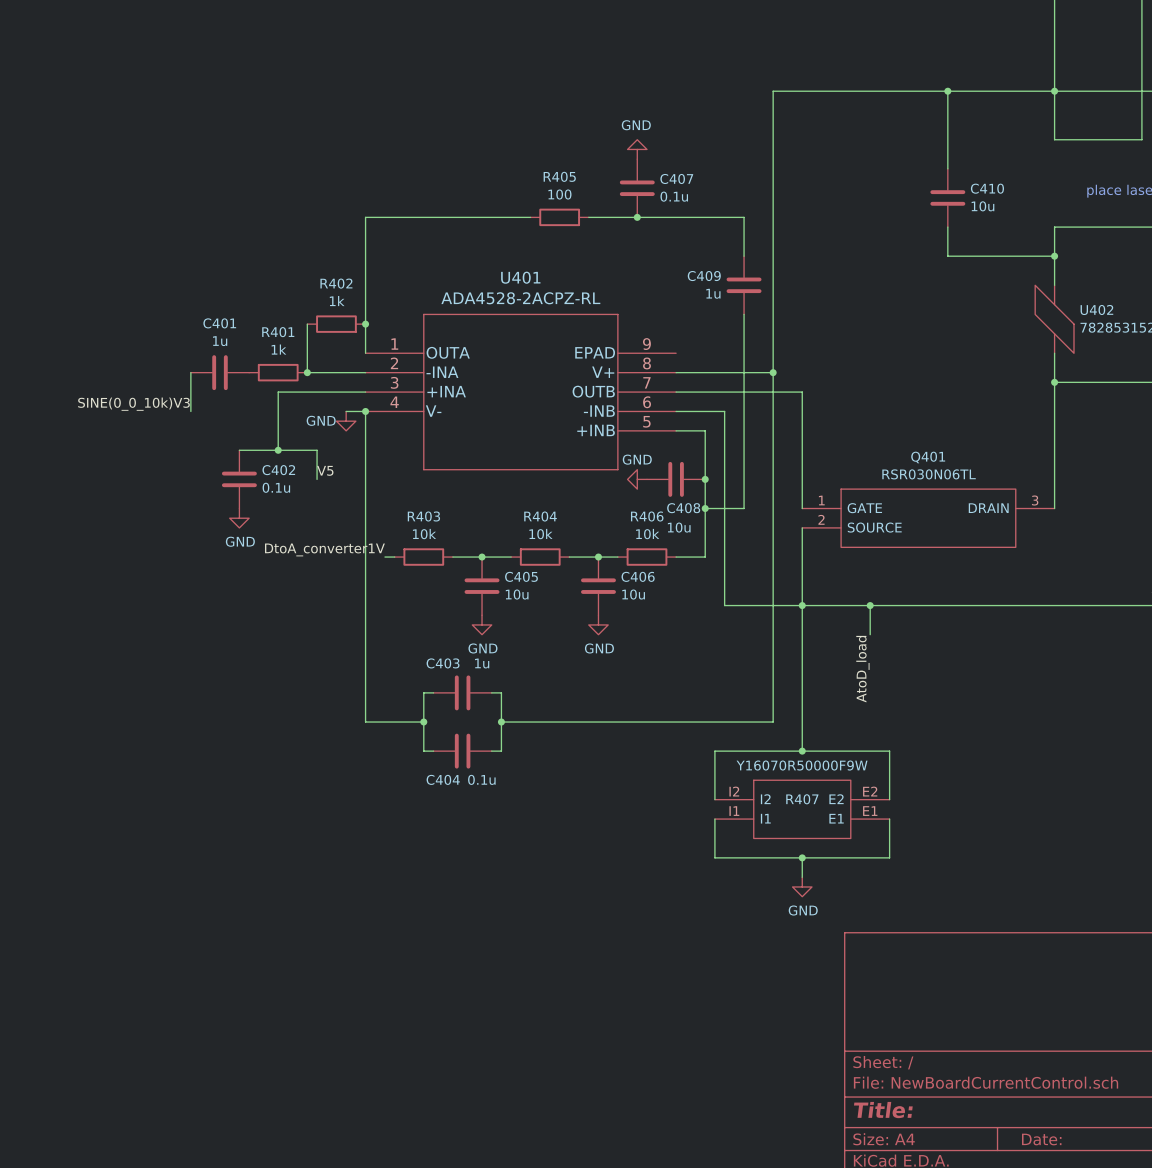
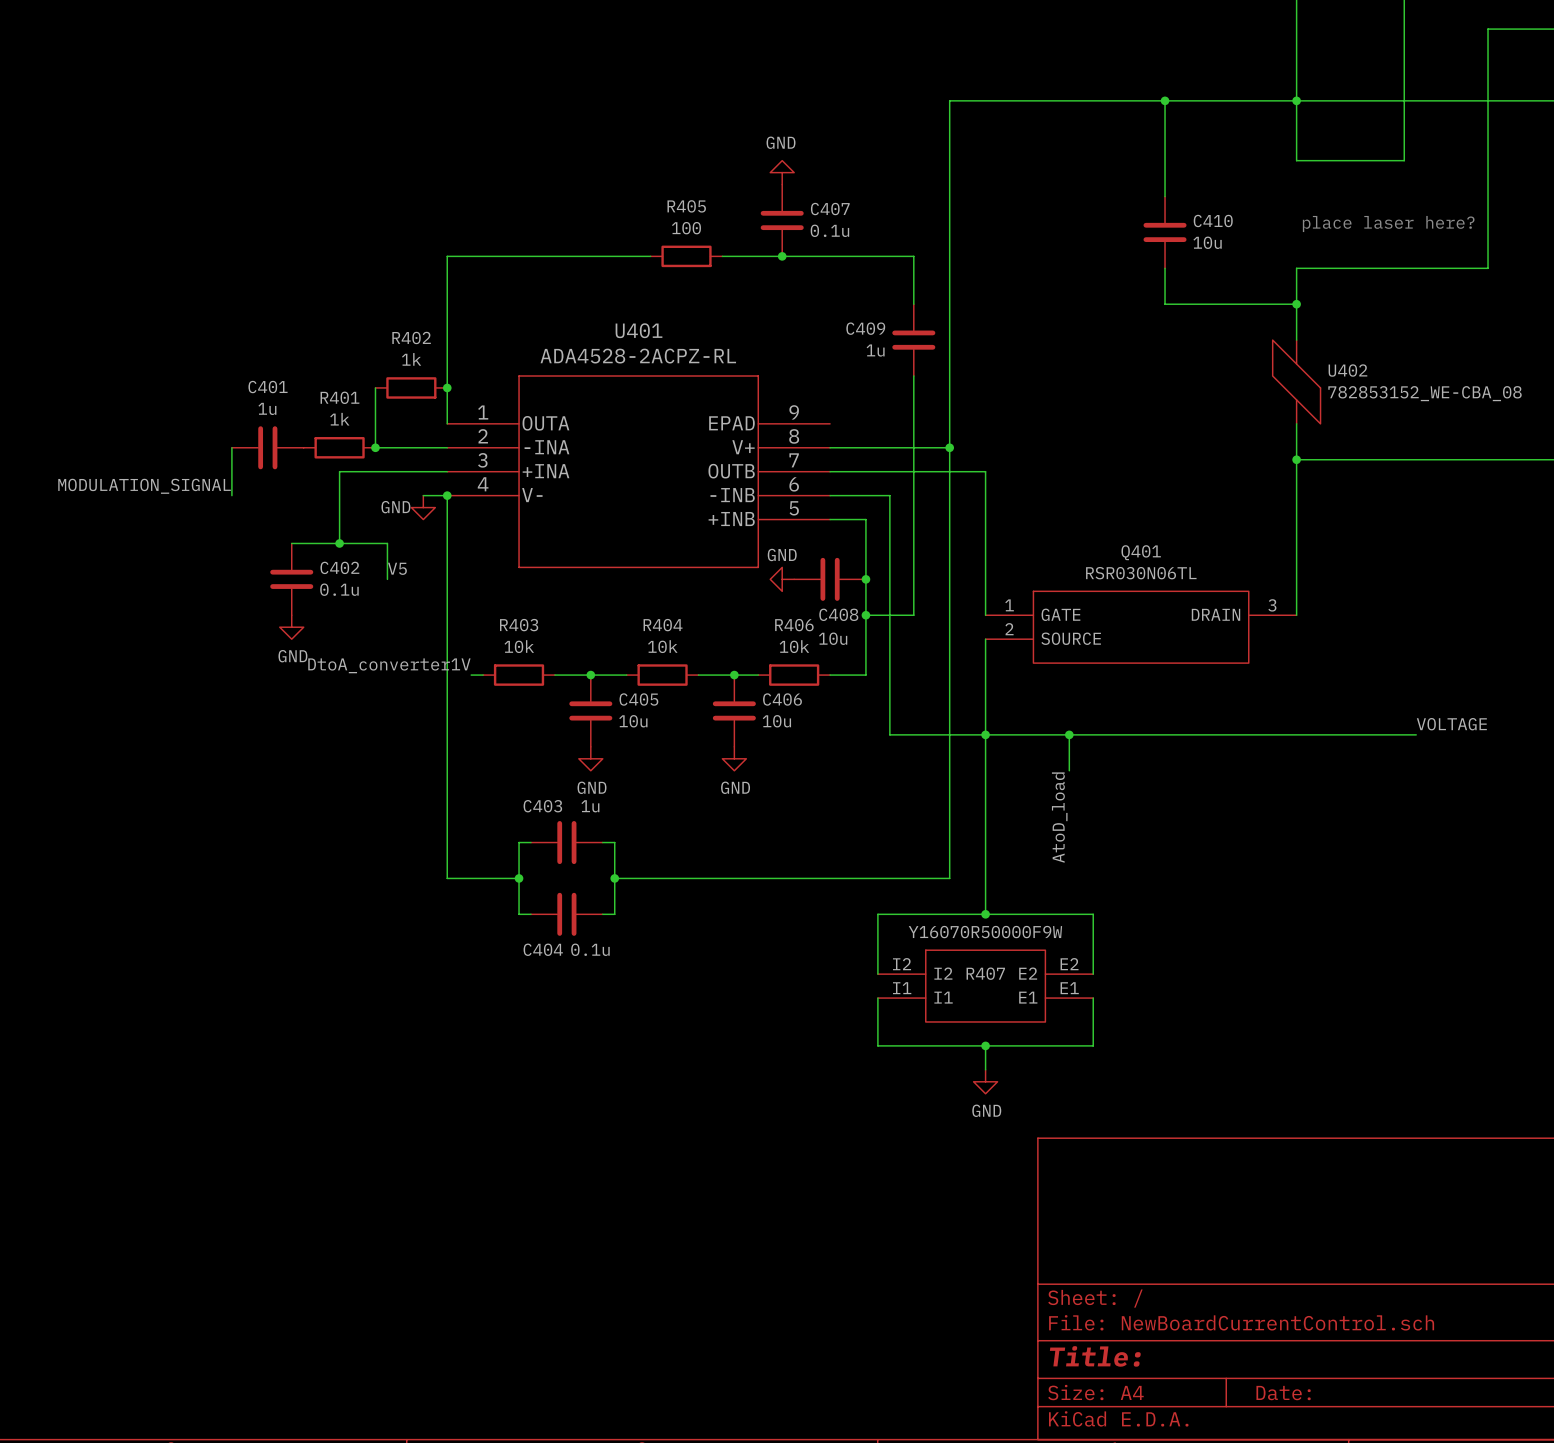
label: SINE(0_0_10k)V3 (133, 404) -> MODULATION_SIGNAL (144, 486)

